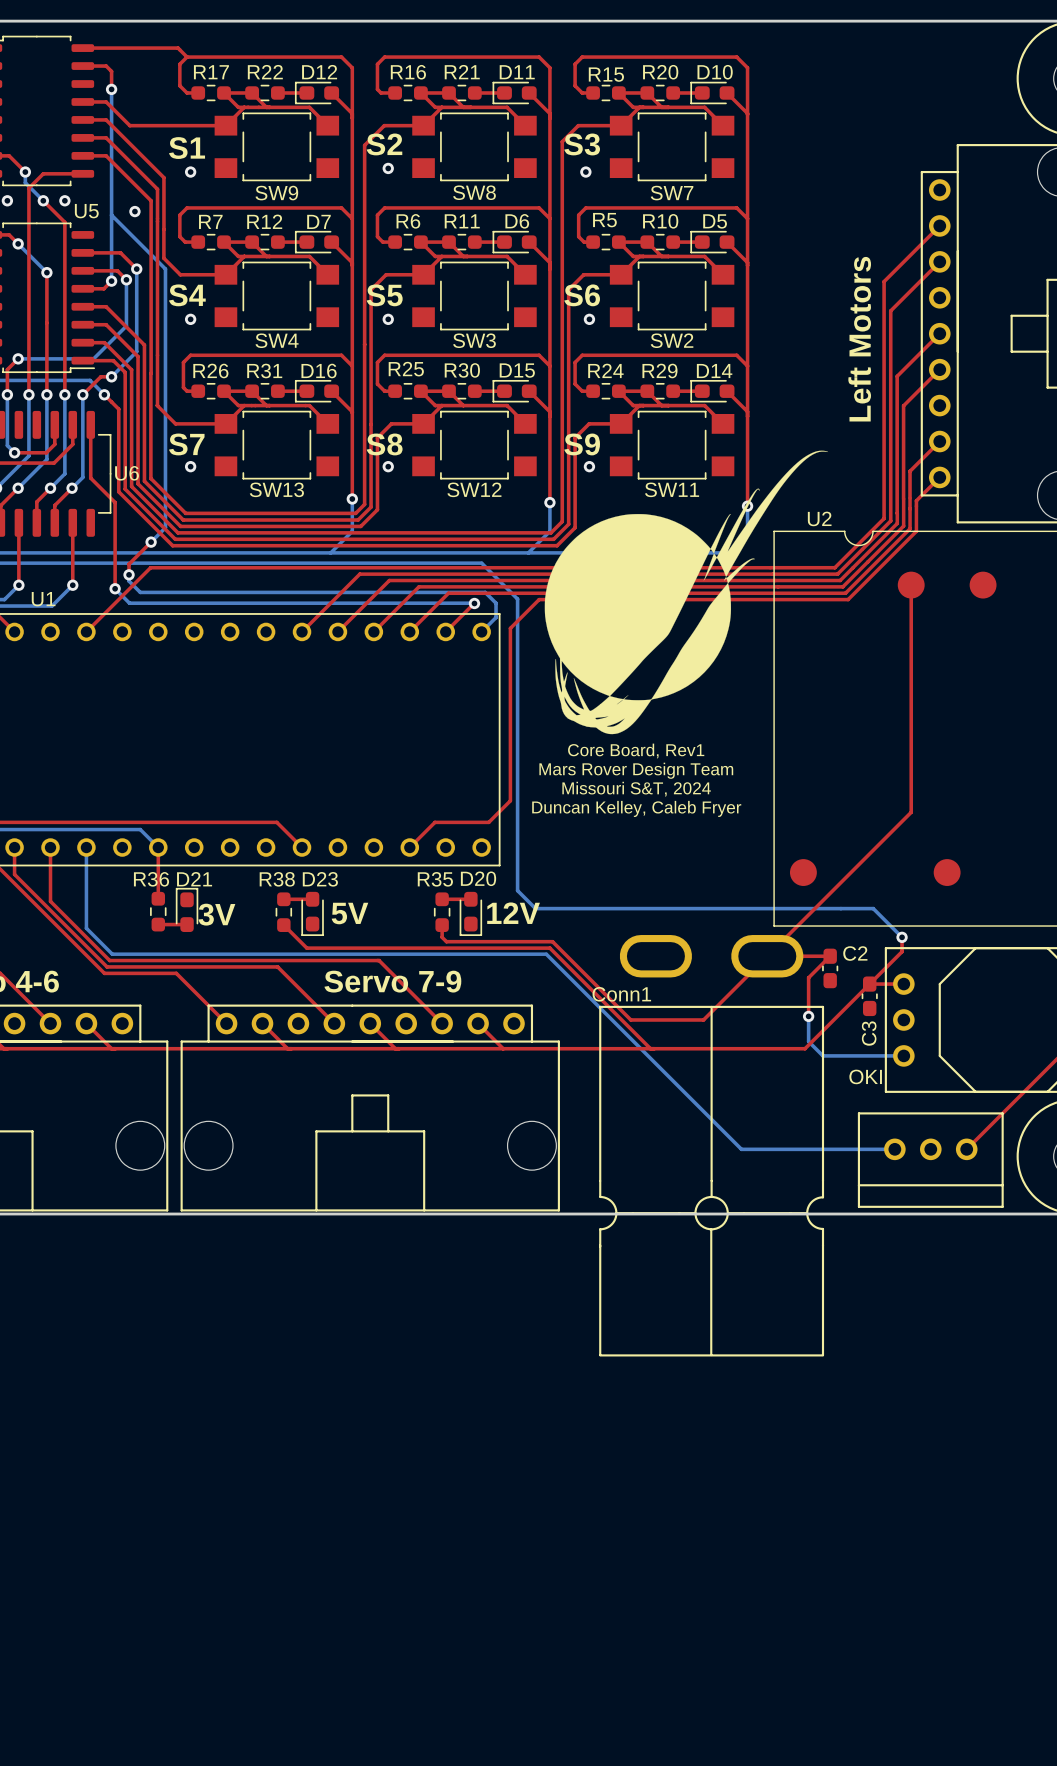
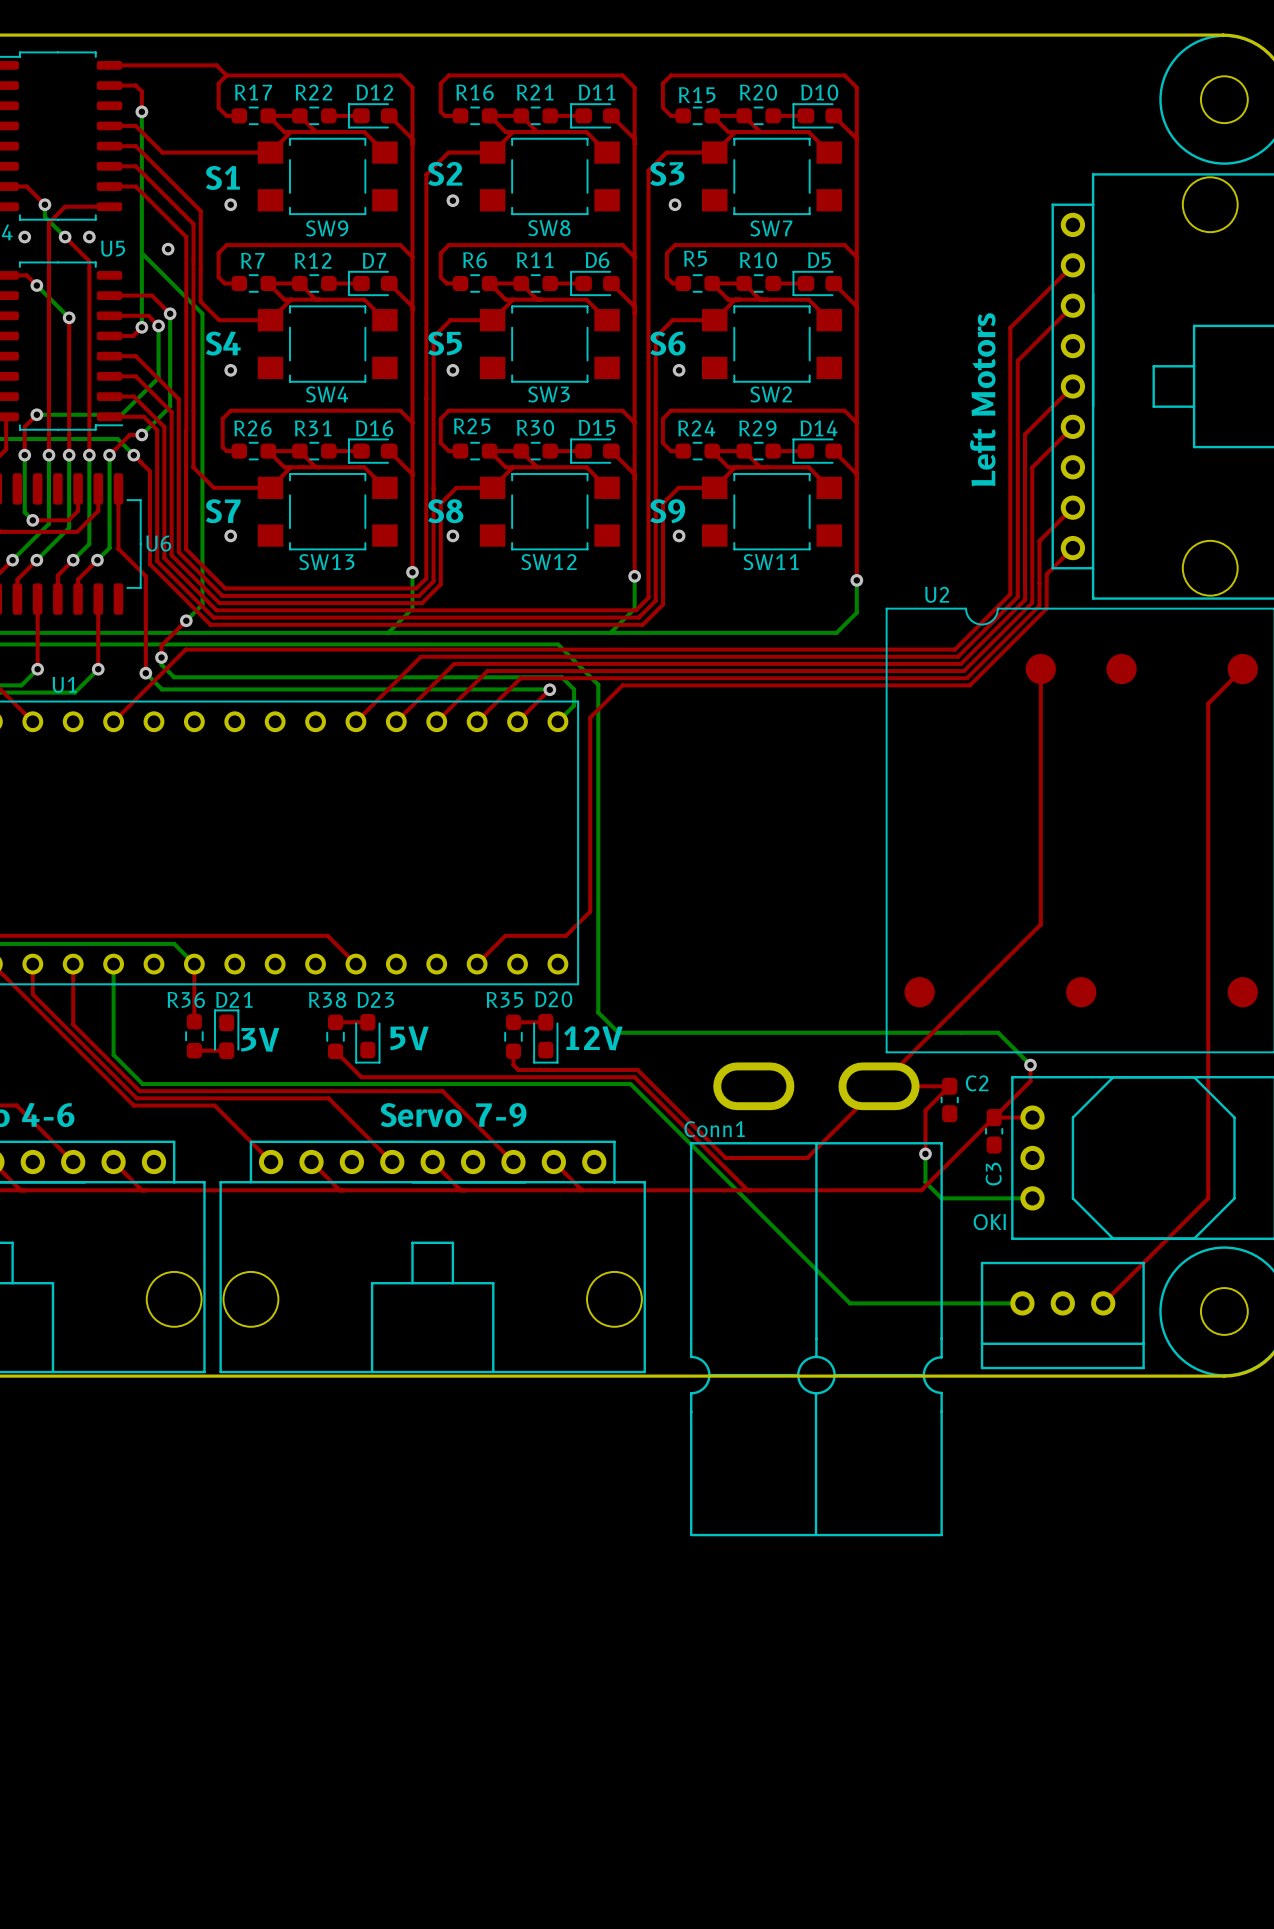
drawing: [544, 450, 829, 735] -> none
text: Core Board, Rev1 (636, 750) -> none
text: Mars Rover Design Team (636, 770) -> none
text: Missouri S&T, 2024 (636, 789) -> none
text: Duncan Kelley, Caleb Fryer (636, 808) -> none

